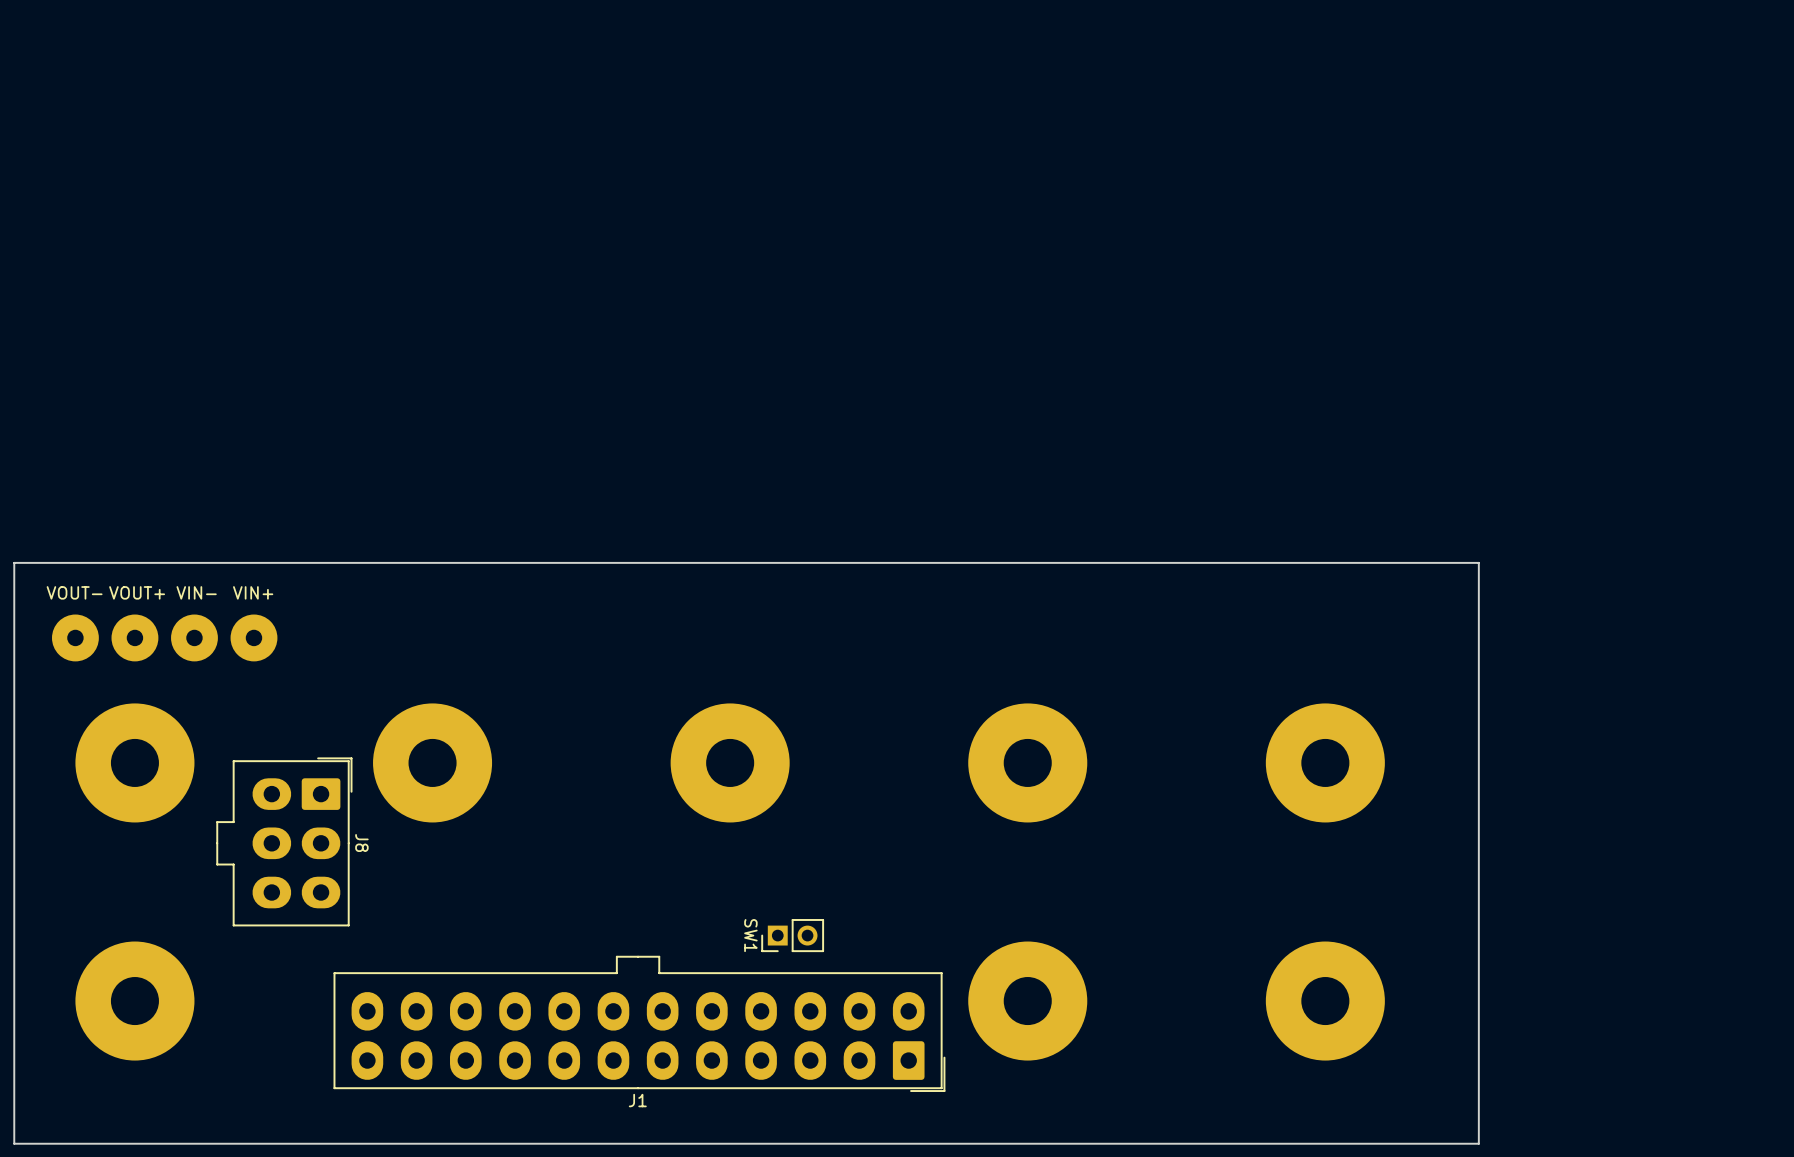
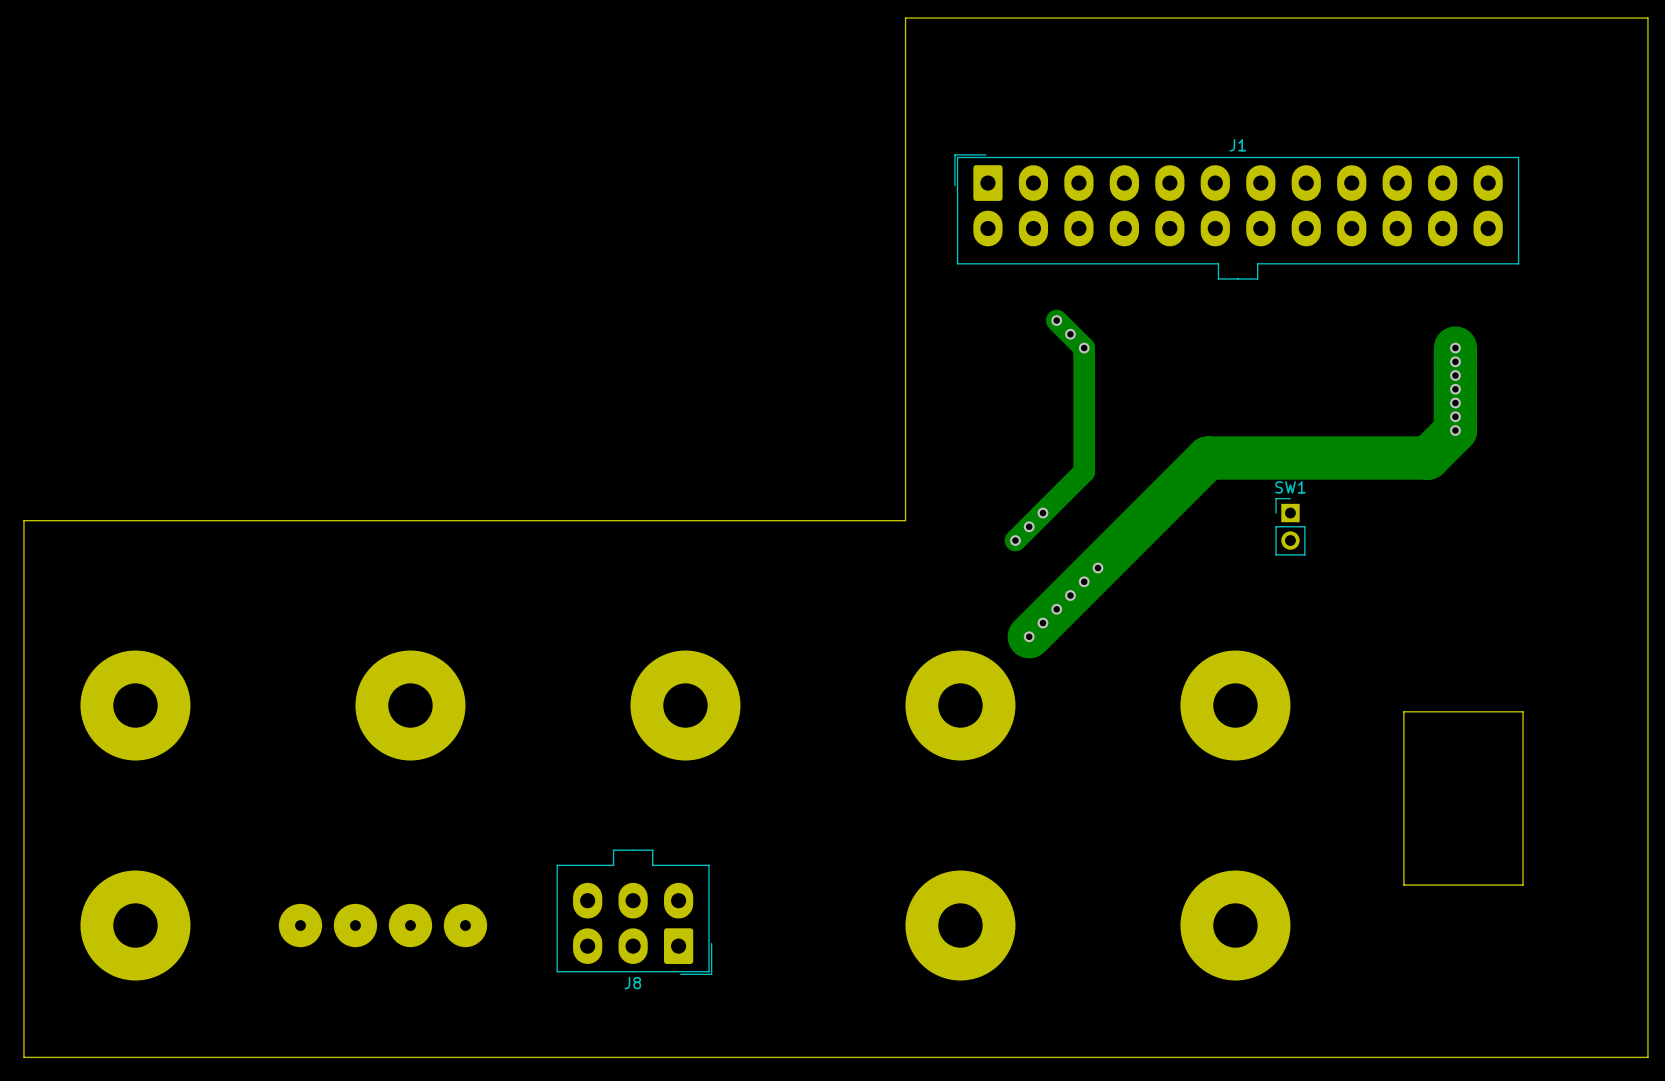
track: none -> (1056, 320) (1084, 348) (1084, 471) (1015, 540)
via: none -> (1056, 320)
via: none -> (1070, 334)
via: none -> (1084, 348)
track: none -> (1455, 348) (1455, 430) (1427, 458) (1207, 458) (1029, 636)
via: none -> (1455, 348)
via: none -> (1455, 361)
via: none -> (1455, 375)
via: none -> (1455, 389)
via: none -> (1455, 403)
via: none -> (1455, 416)
via: none -> (1455, 430)
via: none -> (1042, 513)
board edge: (968, 562) (1478, 562) (1478, 1143) -> (905, 520) (905, 18) (1647, 18) (1647, 1057) (1377, 1057)
via: none -> (1029, 526)
via: none -> (1015, 540)
text: VOUT- (74, 592) -> none
text: VOUT+ (137, 592) -> none
text: VIN- (196, 592) -> none
text: VIN+ (253, 592) -> none
via: none -> (1097, 568)
via: none -> (1084, 581)
part: (164, 637) -> none
via: none -> (1070, 595)
via: none -> (1056, 609)
via: none -> (1042, 623)
via: none -> (1029, 636)
board edge: none -> (1523, 711) (1523, 885) (1403, 885) (1403, 711) (1523, 711)
J8 rotation: 0° (284, 841) -> 90° clockwise (634, 912)
J8 position: (284, 841) -> (634, 912)
SW1 rotation: 0° (792, 935) -> 90° clockwise (1290, 526)
SW1 position: (792, 935) -> (1290, 526)
part: none -> (382, 925)
J1 rotation: 0° (639, 1023) -> 180° (1236, 216)
J1 position: (639, 1023) -> (1236, 216)

